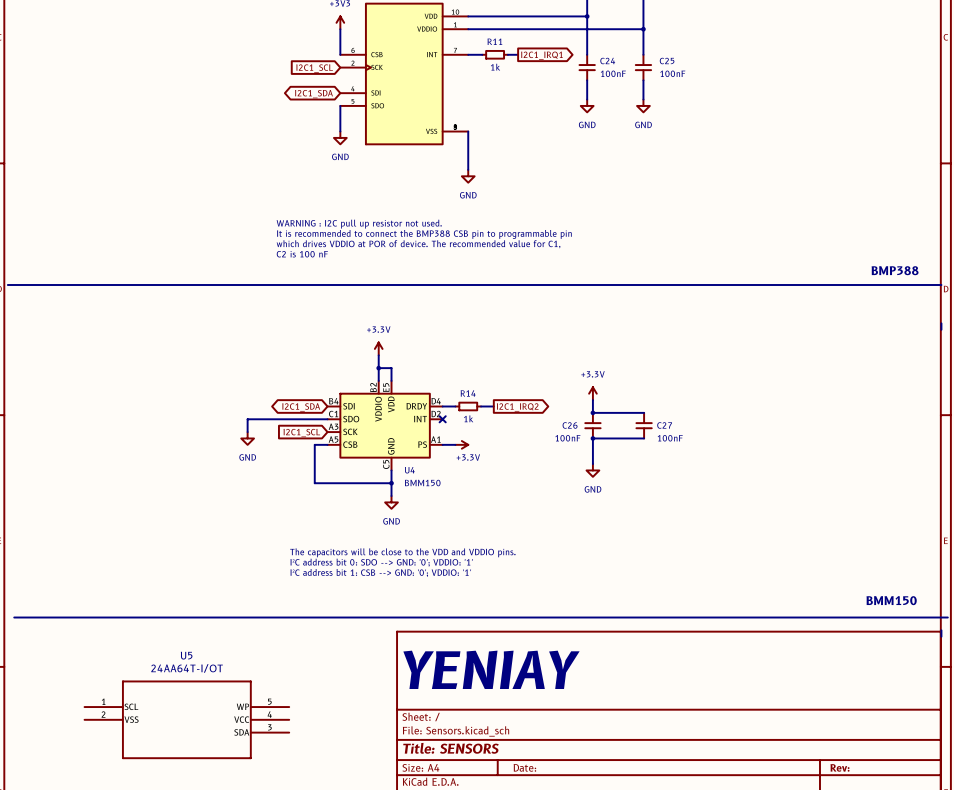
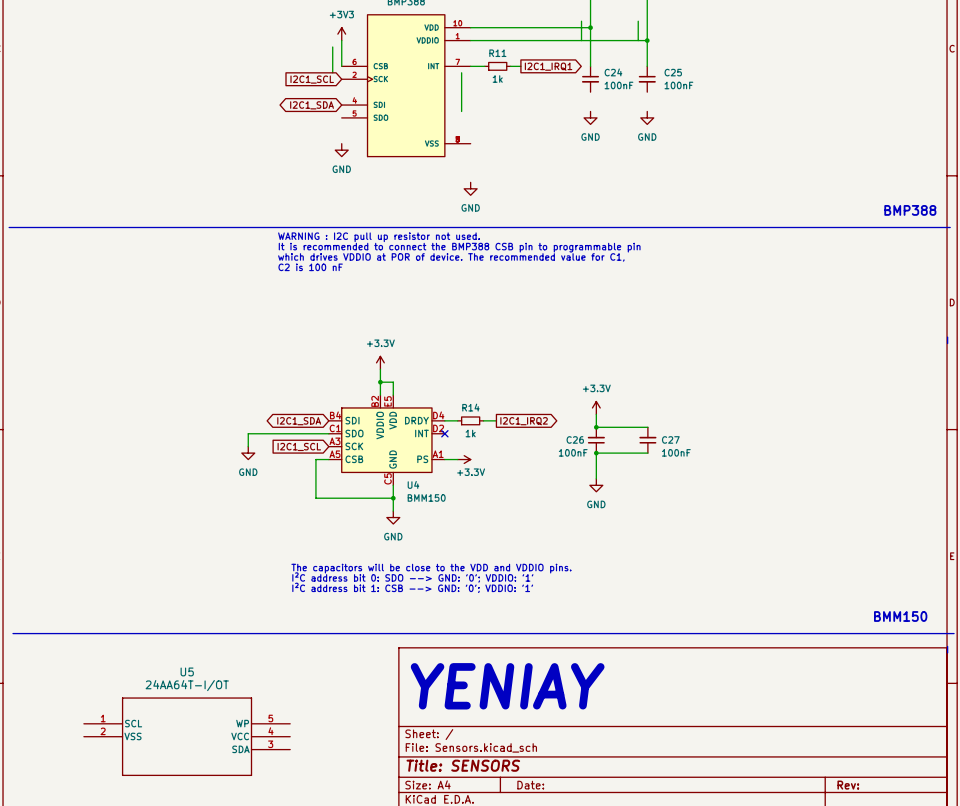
wire: (587, 80) (587, 99) -> (581, 21) (581, 40)
wire: (643, 80) (643, 99) -> (638, 21) (638, 40)
wire: (340, 105) (340, 131) -> (332, 47) (332, 72)
wire: (468, 131) (468, 169) -> (461, 72) (461, 111)
text position: BMP388 (895, 270) -> BMP388 (910, 210)
bus: (7, 284) (941, 284) -> (9, 227) (950, 227)

